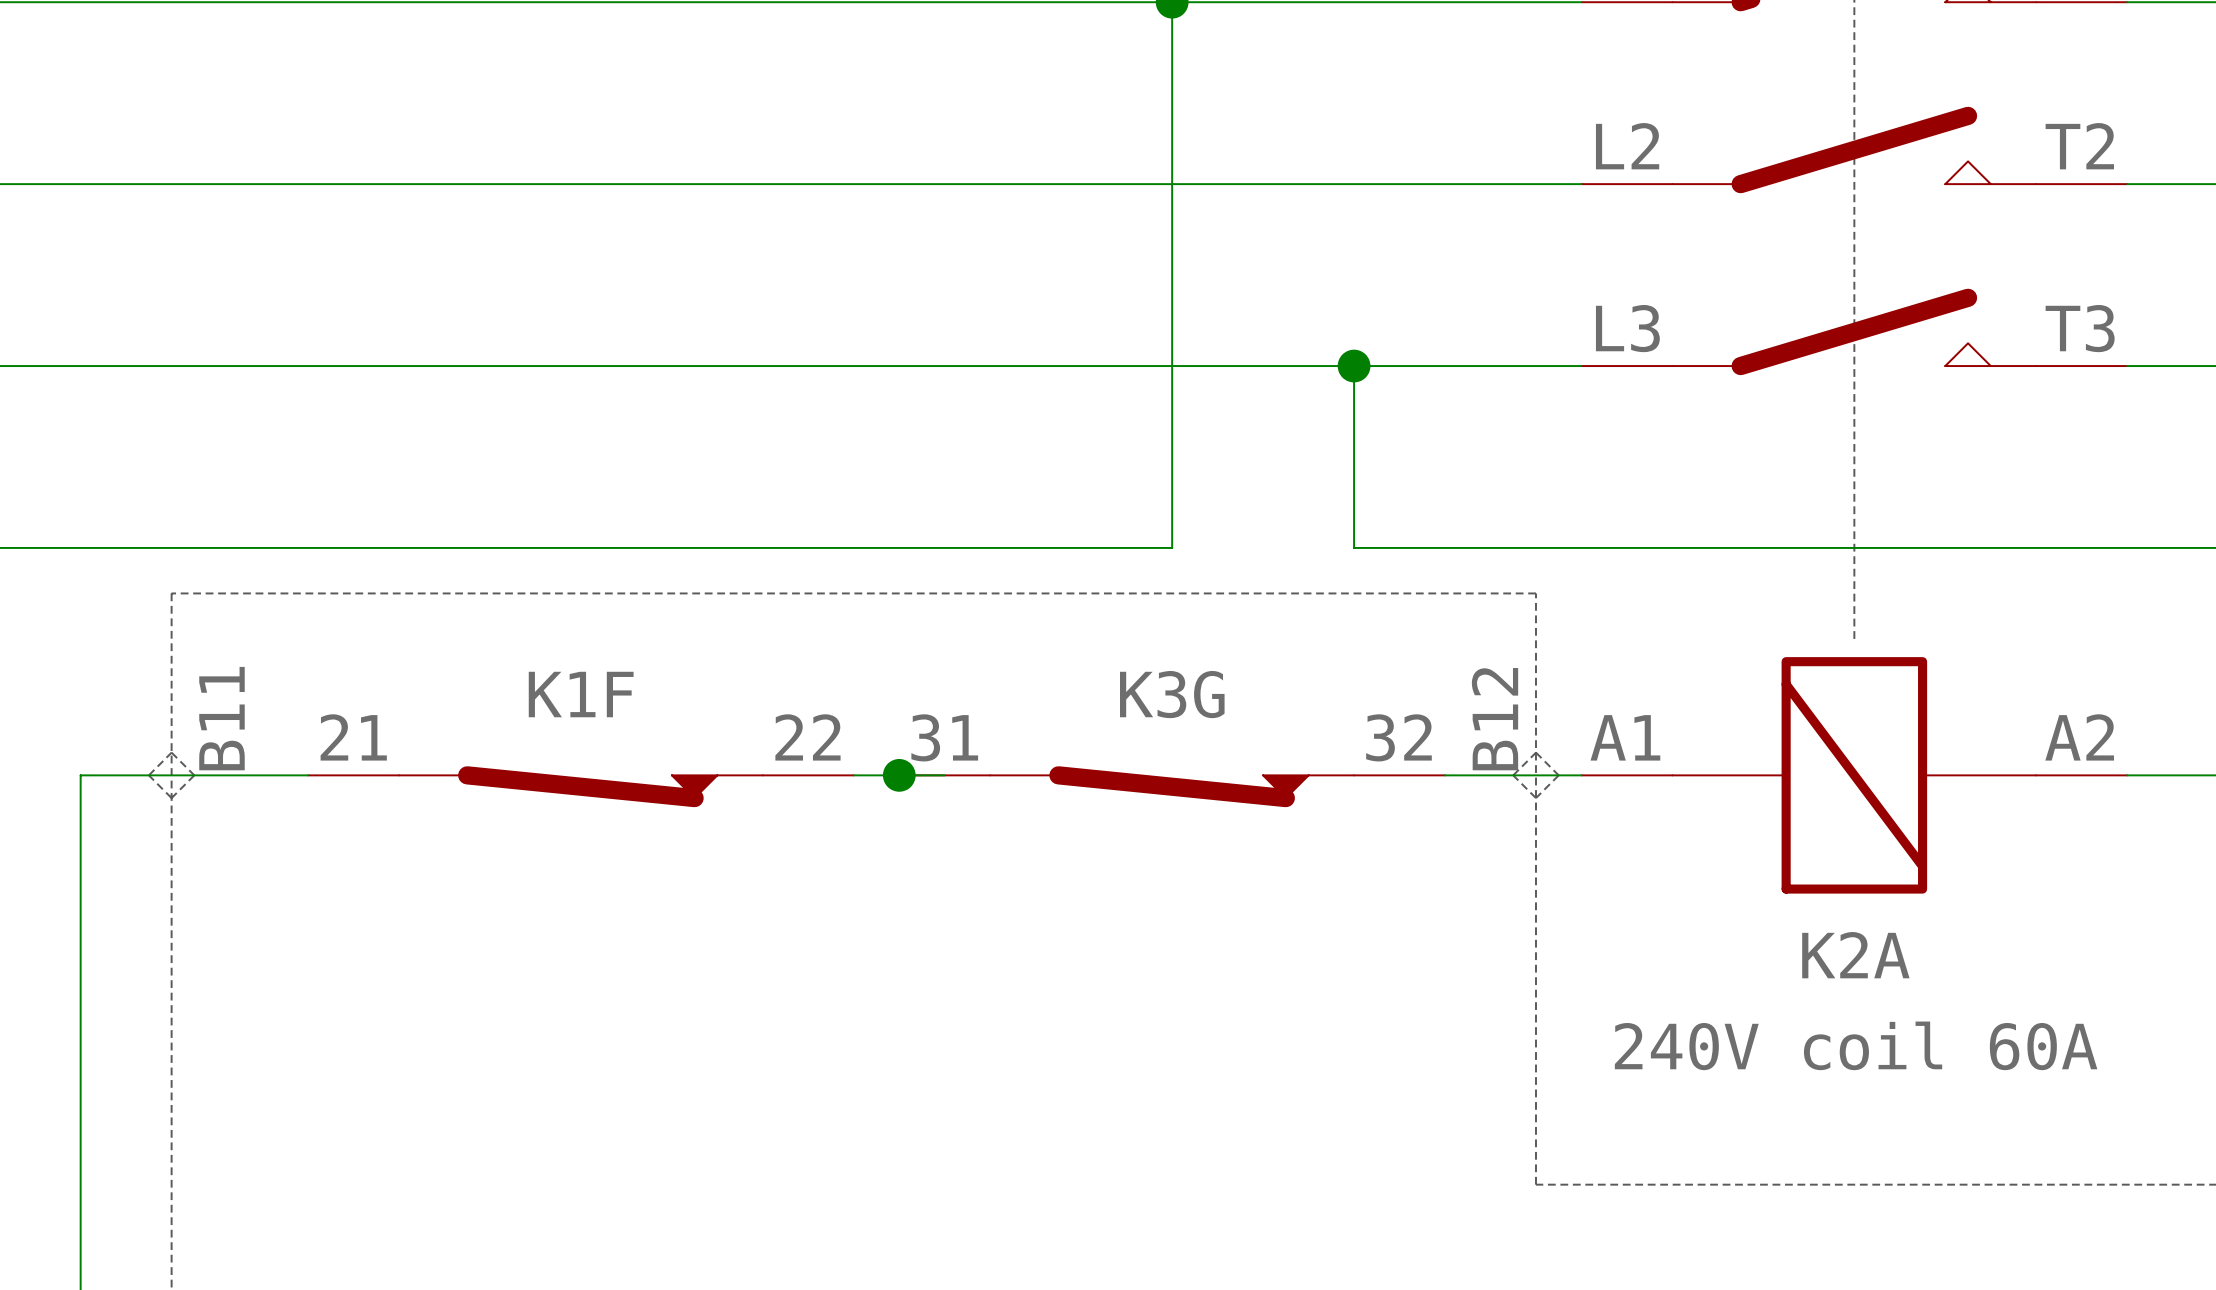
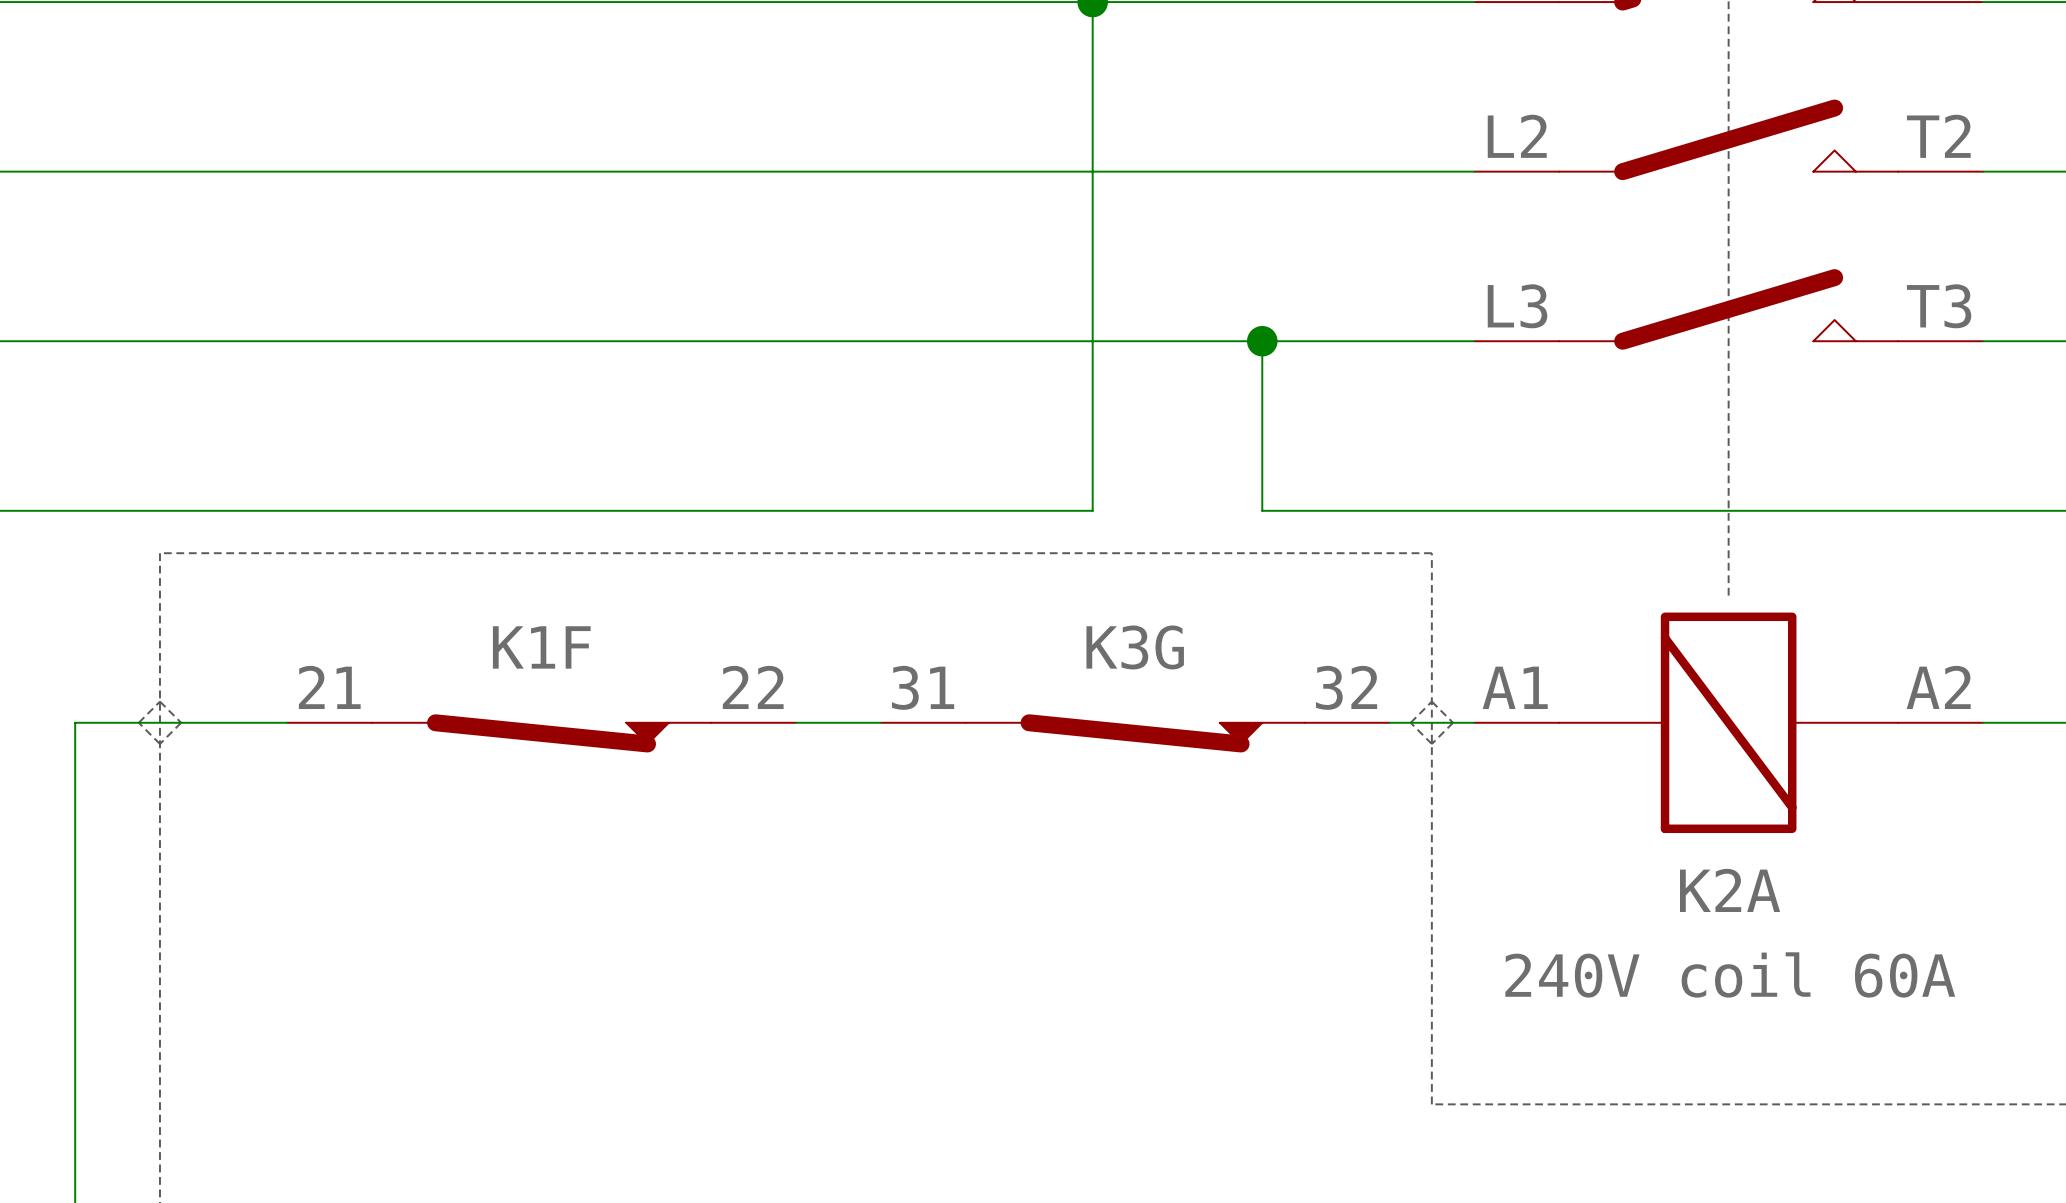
label: B11 (221, 718) -> none
label: B12 (1495, 719) -> none
junction: (899, 775) -> none
K3G position: (1172, 786) -> (1135, 733)

